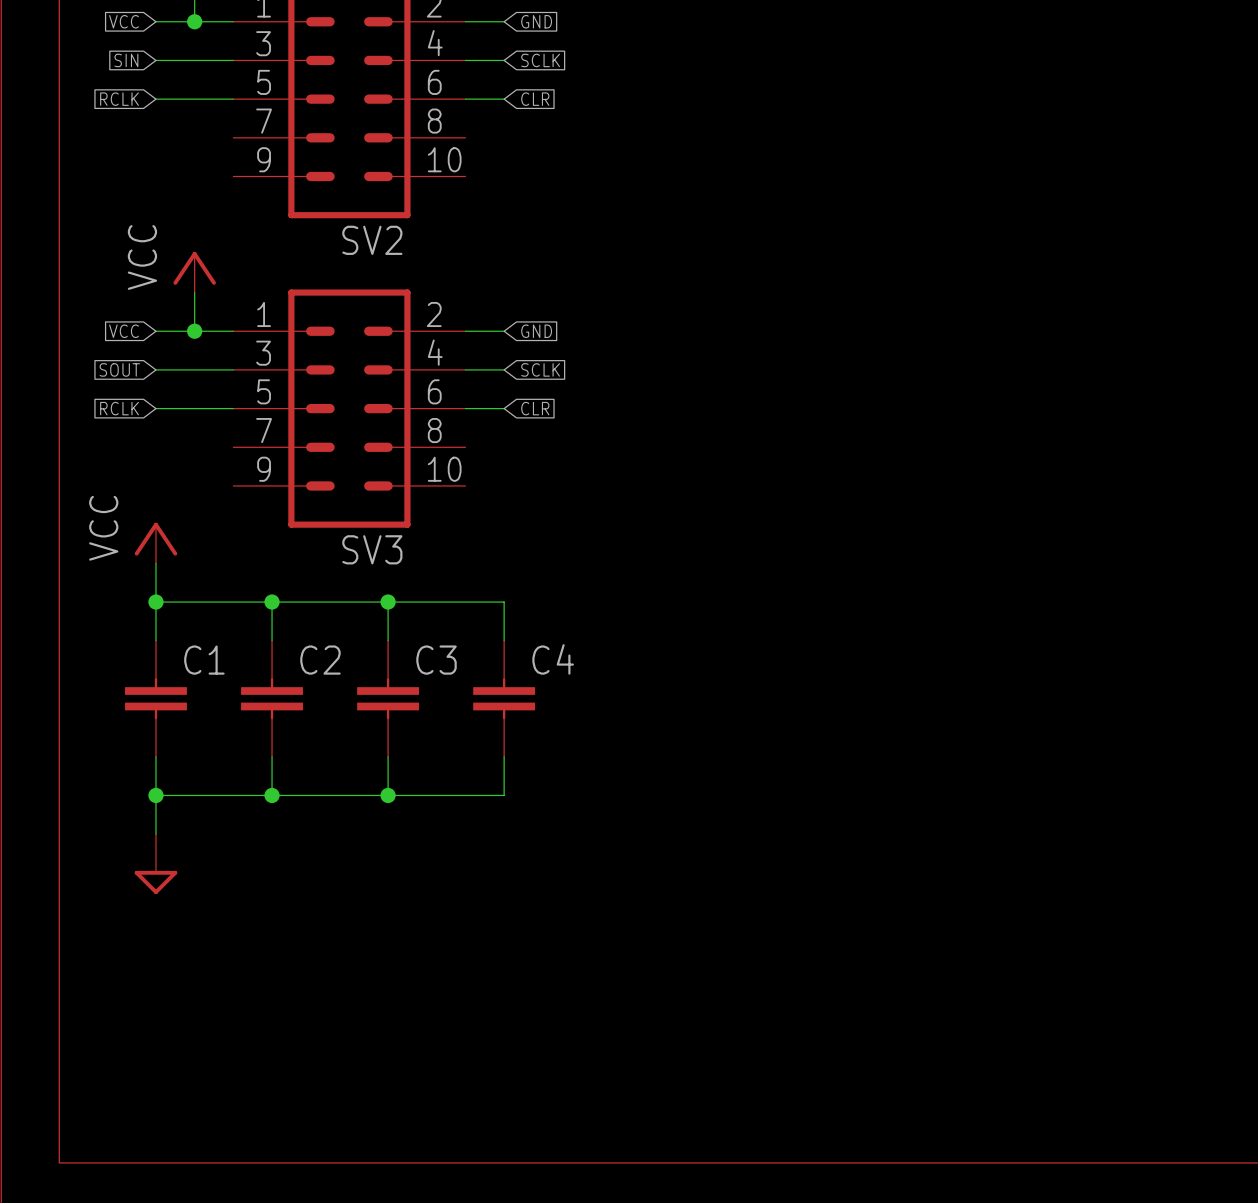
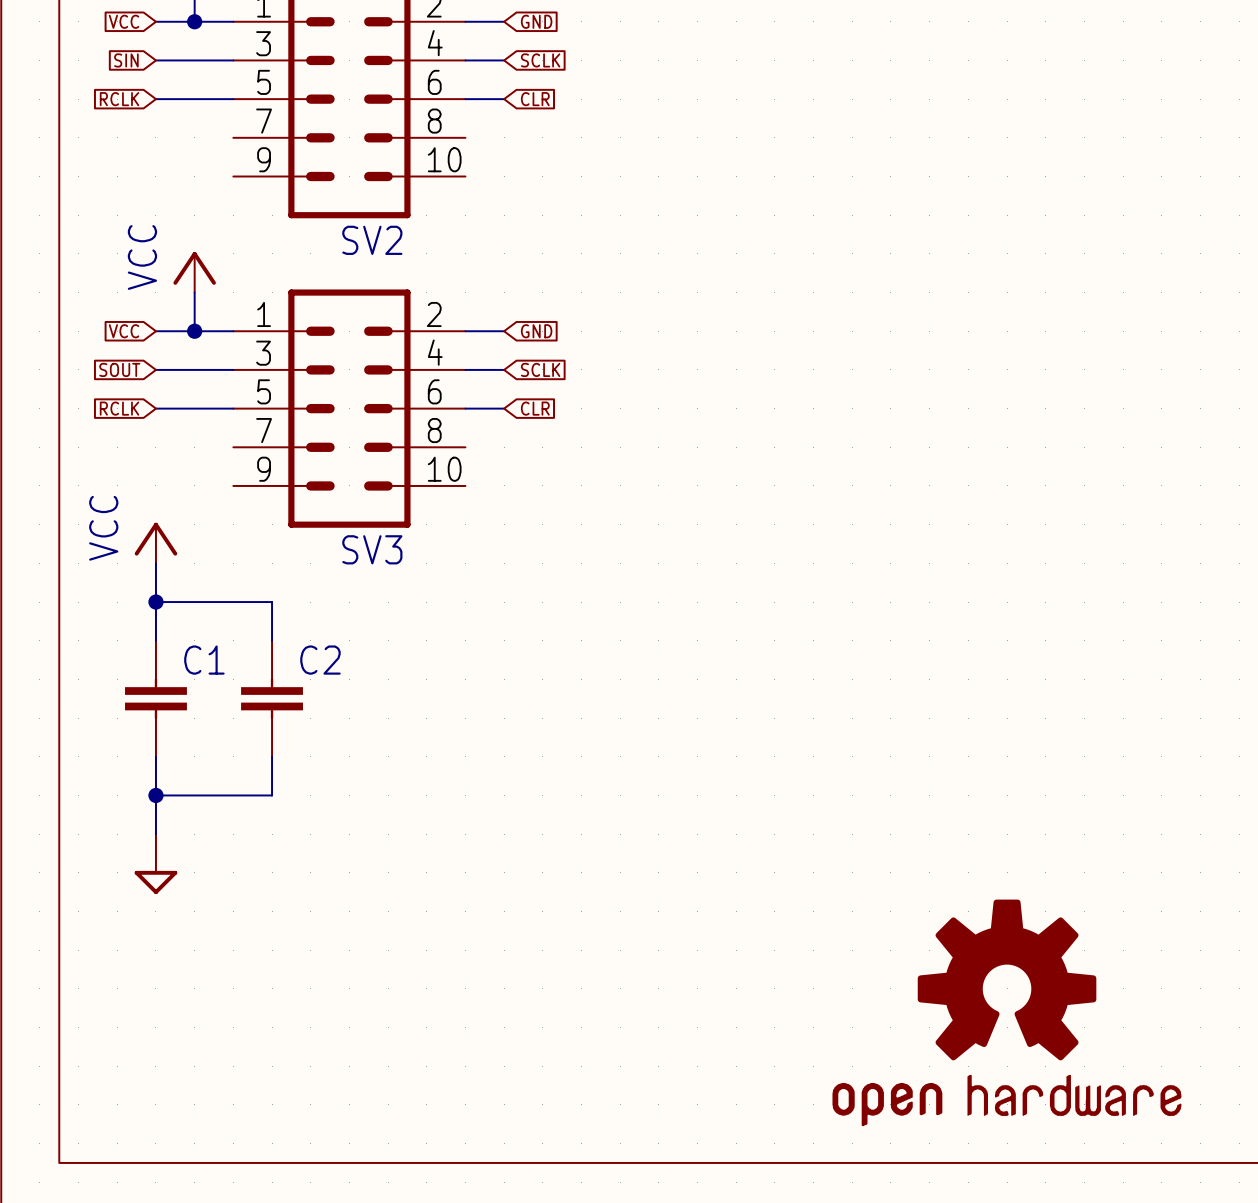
wire: (272, 602) (504, 602) (504, 640) -> none
junction: (272, 602) -> none
wire: (388, 602) (388, 640) -> none
junction: (388, 602) -> none
C3: (388, 698) -> none
C4: (504, 698) -> none
wire: (388, 756) (388, 795) -> none
wire: (504, 756) (504, 795) (272, 795) -> none
junction: (272, 795) -> none
junction: (388, 795) -> none
part: none -> (1006, 1012)

